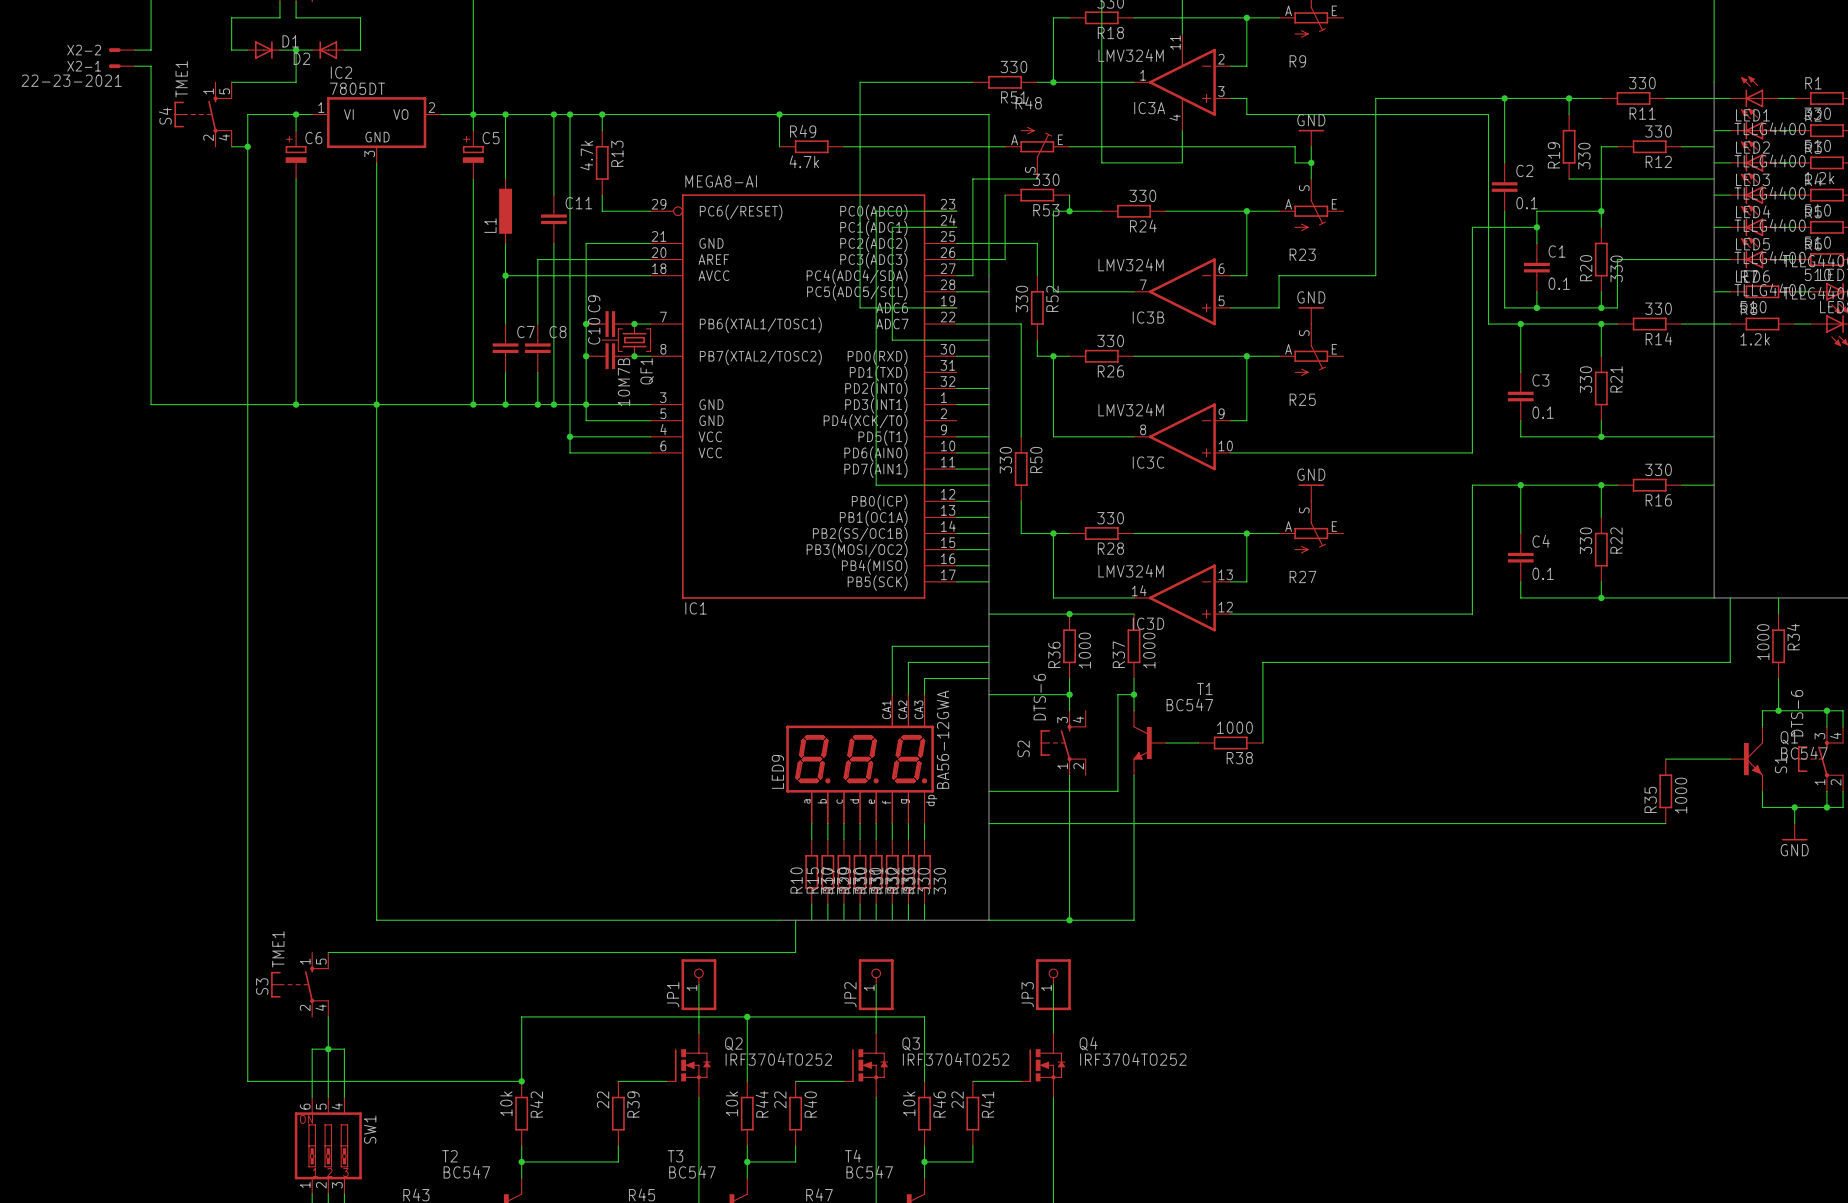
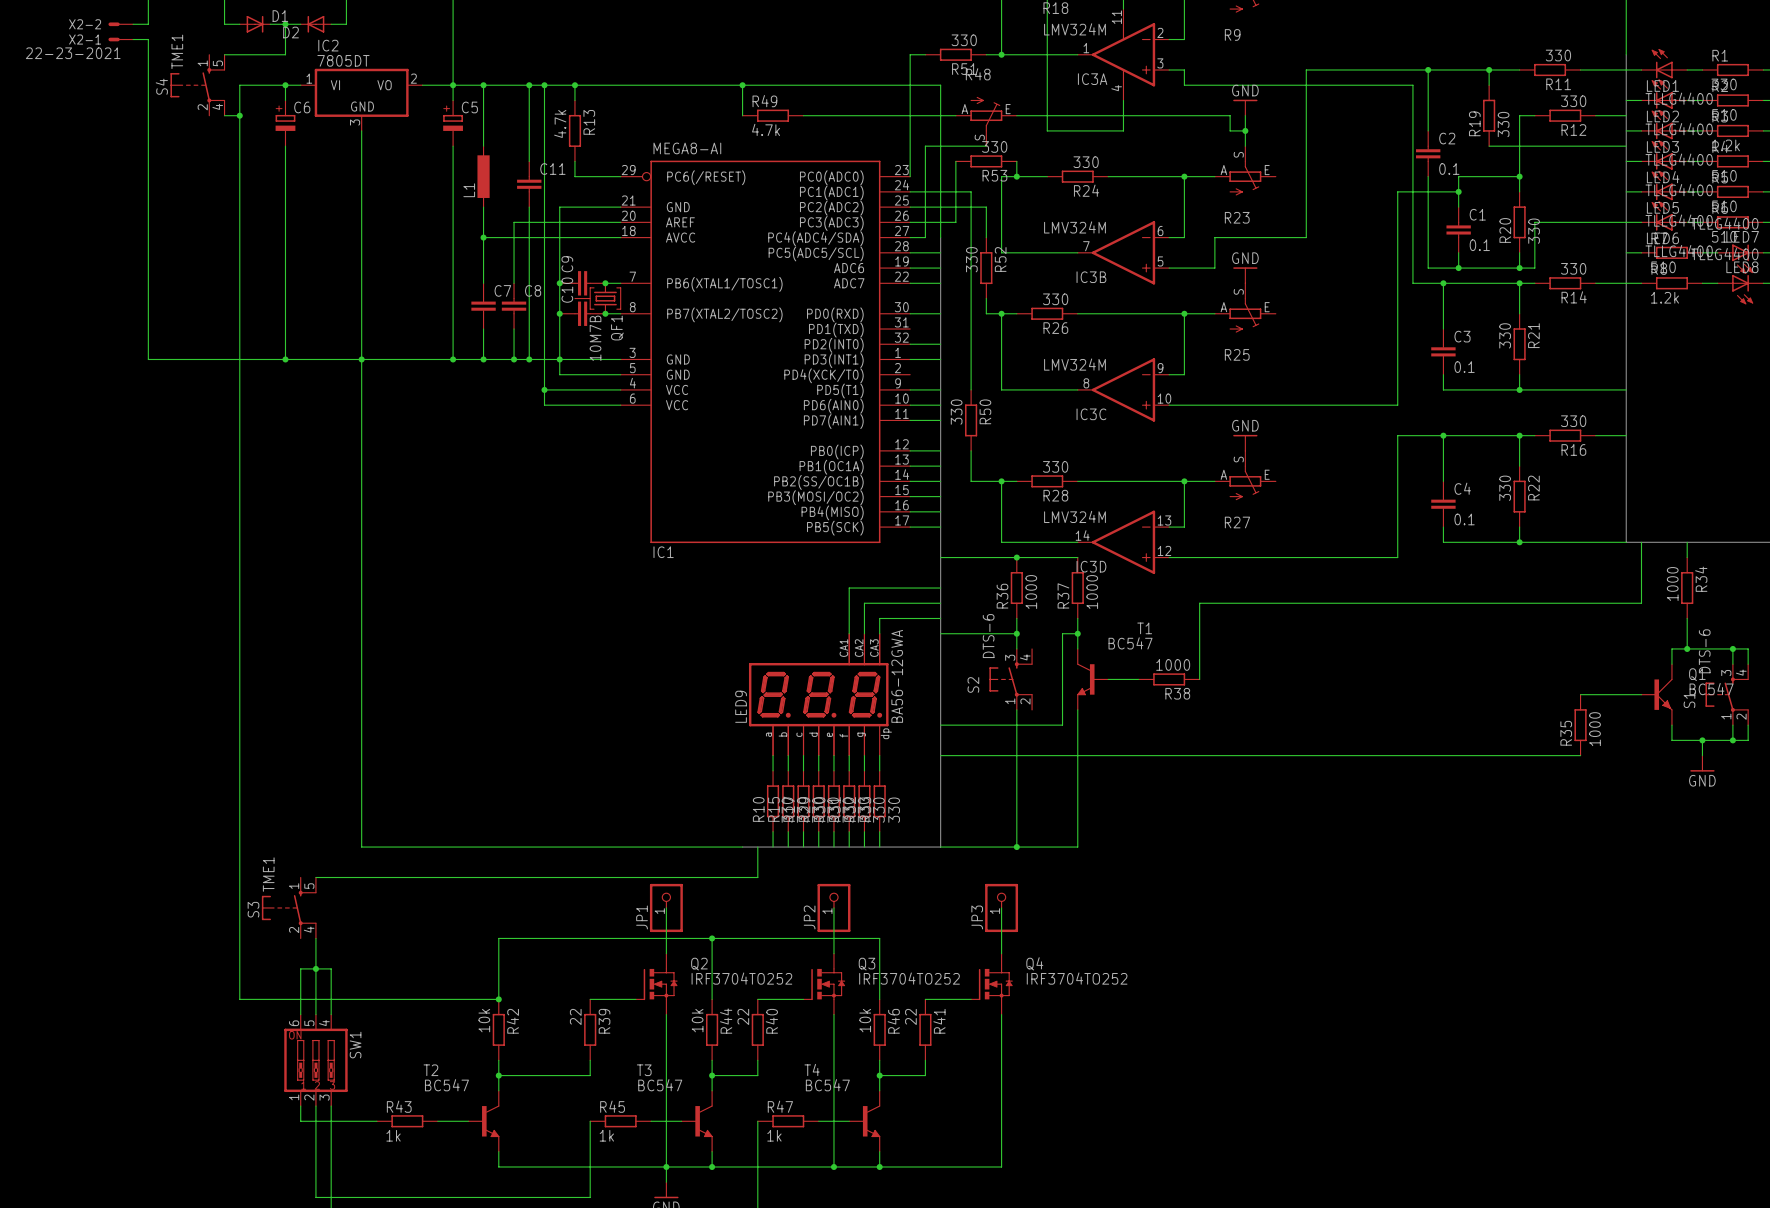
wire: (956, 82) (860, 82) (860, 307) (956, 307) -> (910, 54) (910, 176)
wire: (956, 211) (876, 211) (876, 485) (988, 485) -> none
wire: (956, 227) (892, 227) (892, 340) (988, 340) -> (910, 191) (971, 191) (971, 283)
wire: (988, 324) (1021, 324) -> (910, 268) (940, 268)

